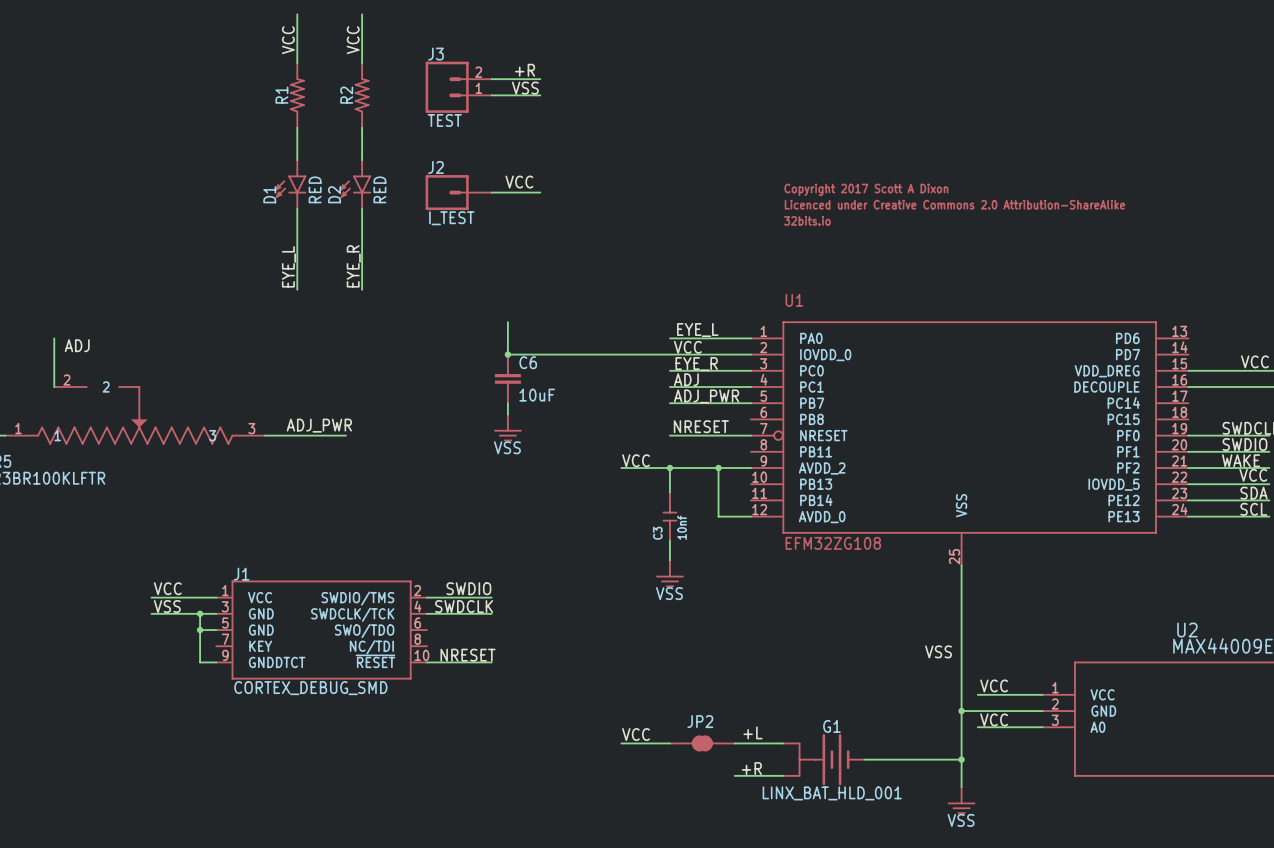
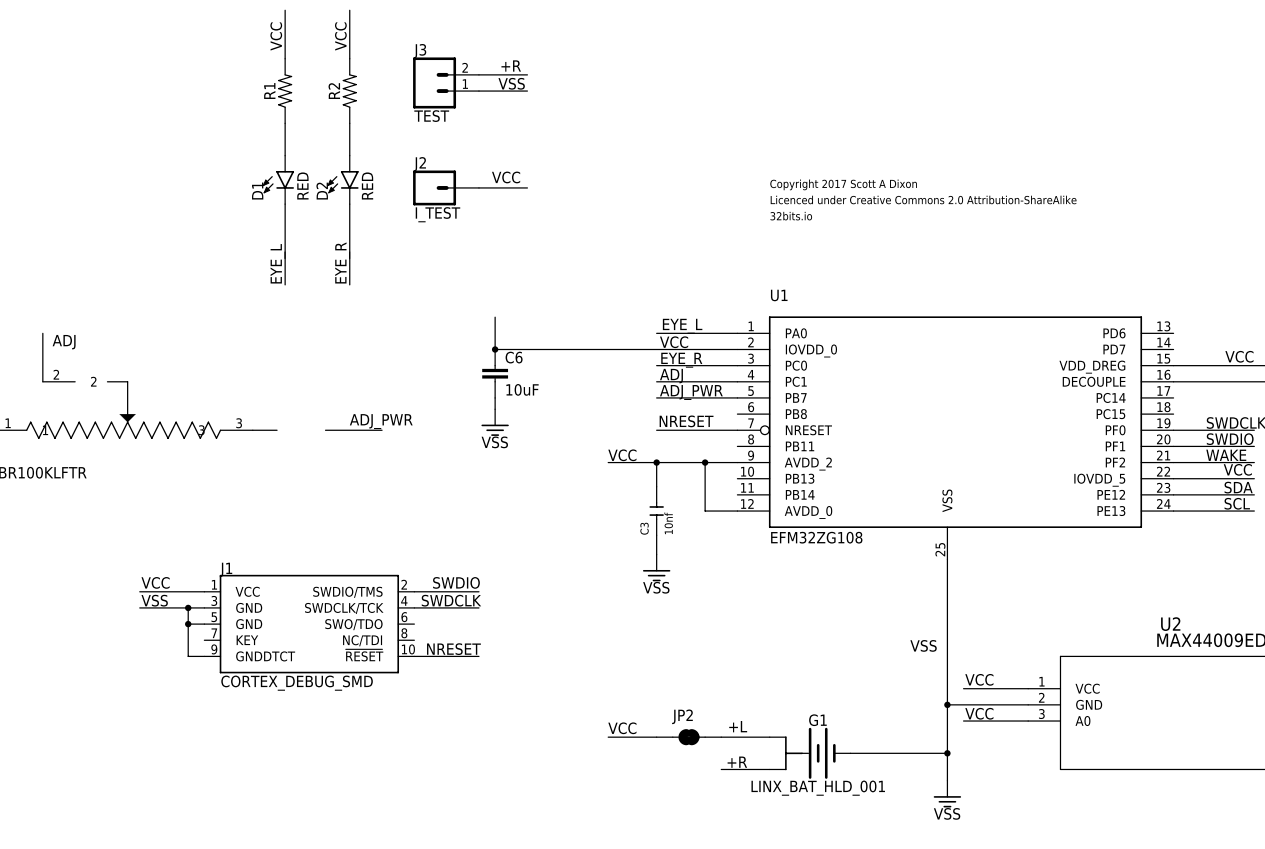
label position: ADJ_PWR (319, 425) -> ADJ_PWR (381, 421)
wire: (289, 435) (337, 435) -> (333, 430) (382, 430)

